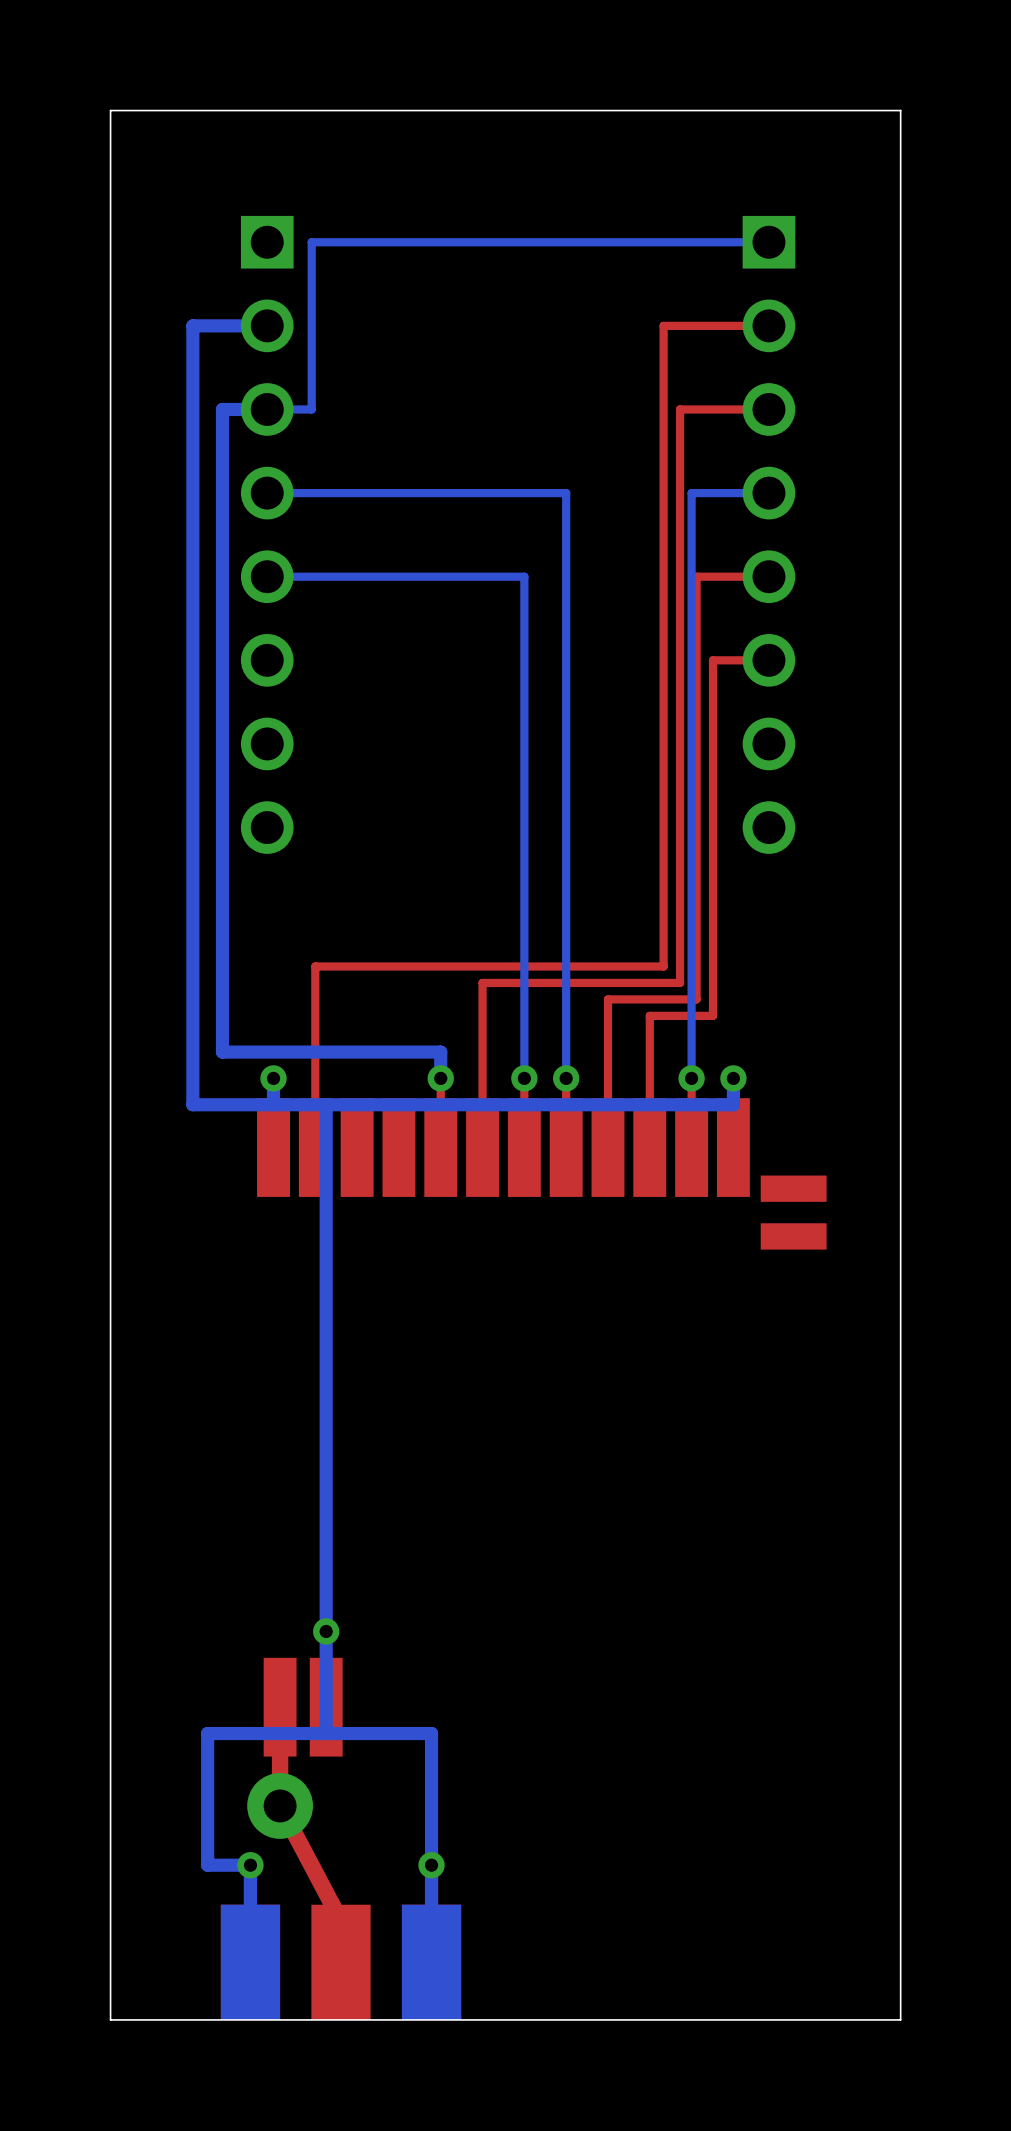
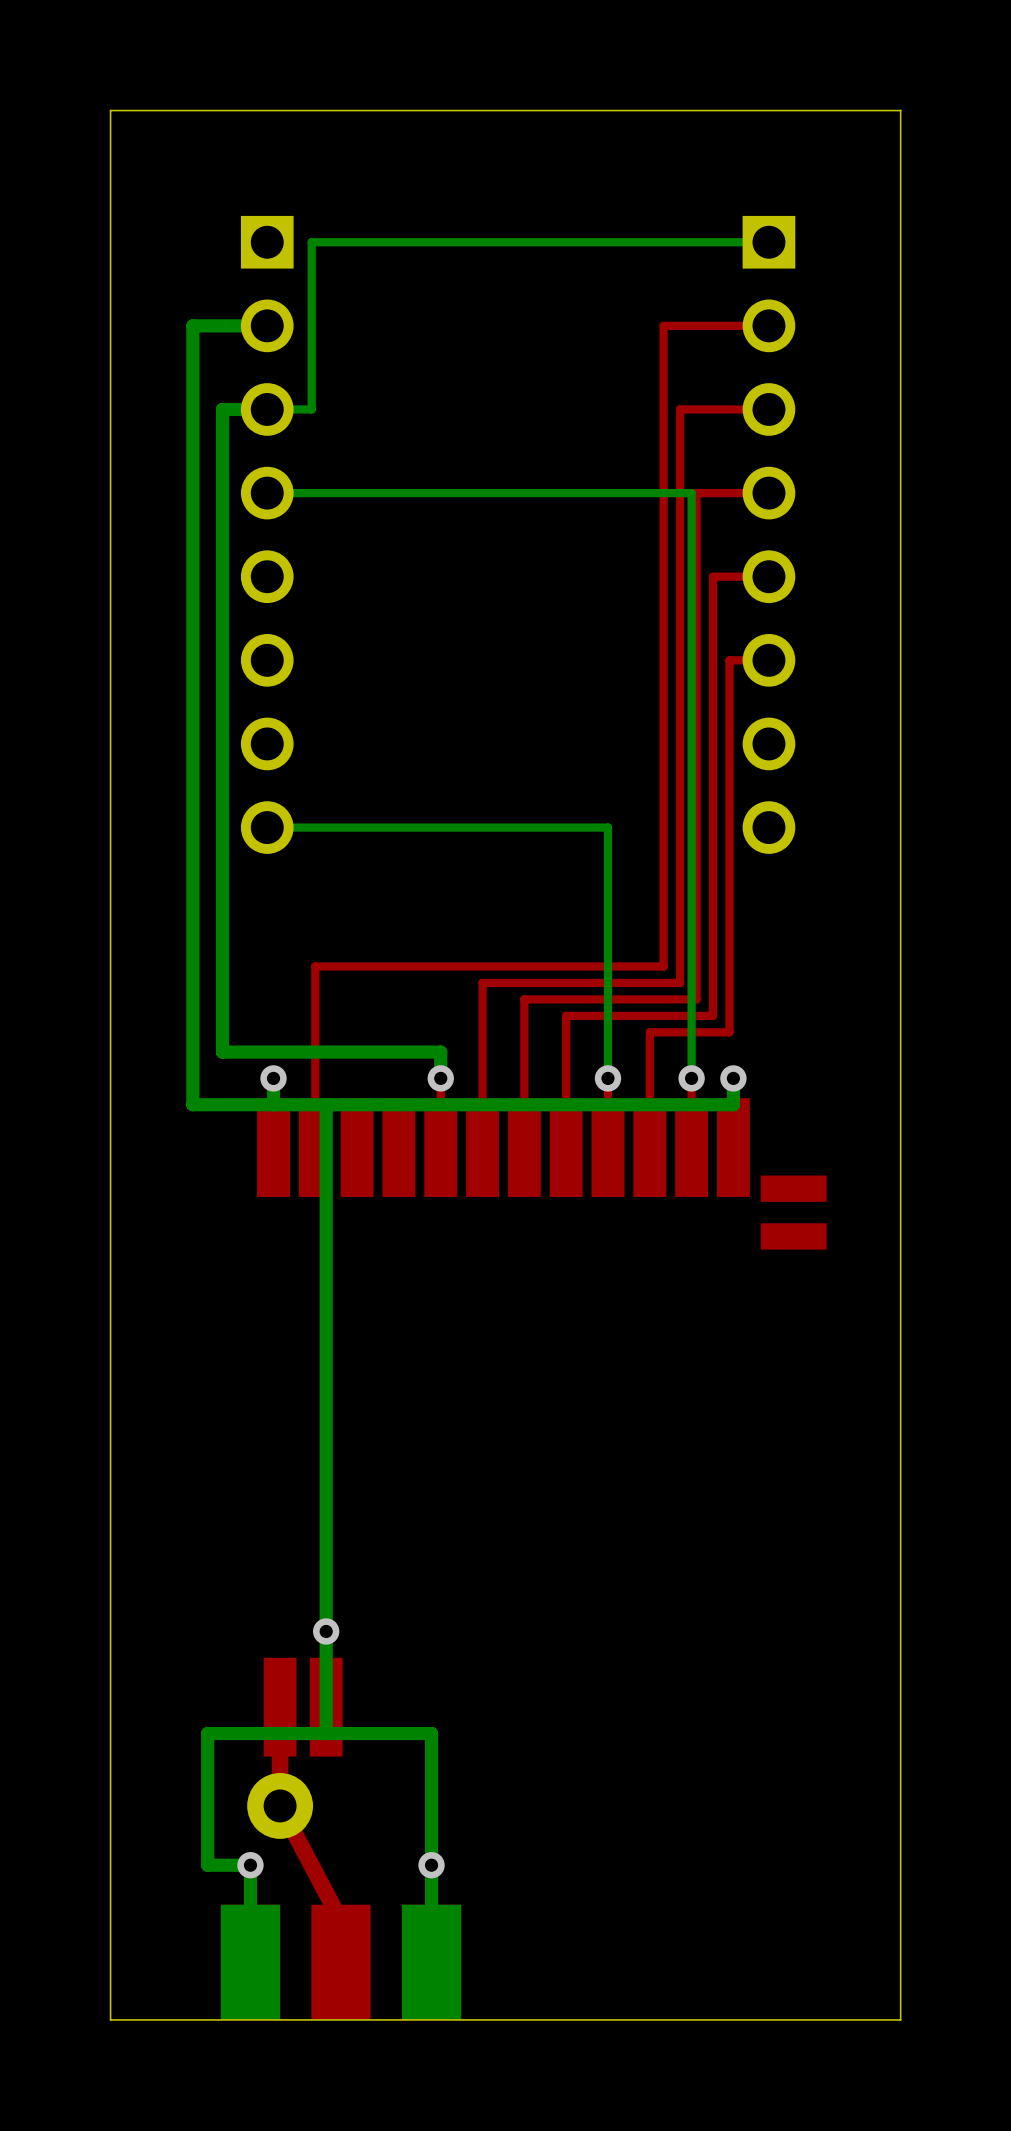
bottom track: (566, 493) (566, 1078) -> none
top track: none -> (768, 493) (696, 493) (696, 576)
bottom track: (768, 493) (691, 493) -> (566, 493) (691, 493)
bottom track: (267, 576) (524, 576) (524, 1078) -> none
top track: (713, 576) (696, 576) -> (713, 576) (713, 660)
top track: (729, 660) (713, 660) -> (729, 660) (729, 1032) (649, 1032)
bottom track: none -> (267, 827) (607, 827) (607, 1078)
top track: (607, 999) (607, 1078) -> (607, 999) (524, 999) (524, 1078)
top track: (649, 1015) (649, 1032) -> (649, 1015) (566, 1015) (566, 1078)
via: (524, 1078) -> none
via: (566, 1078) -> none
via: none -> (607, 1078)

